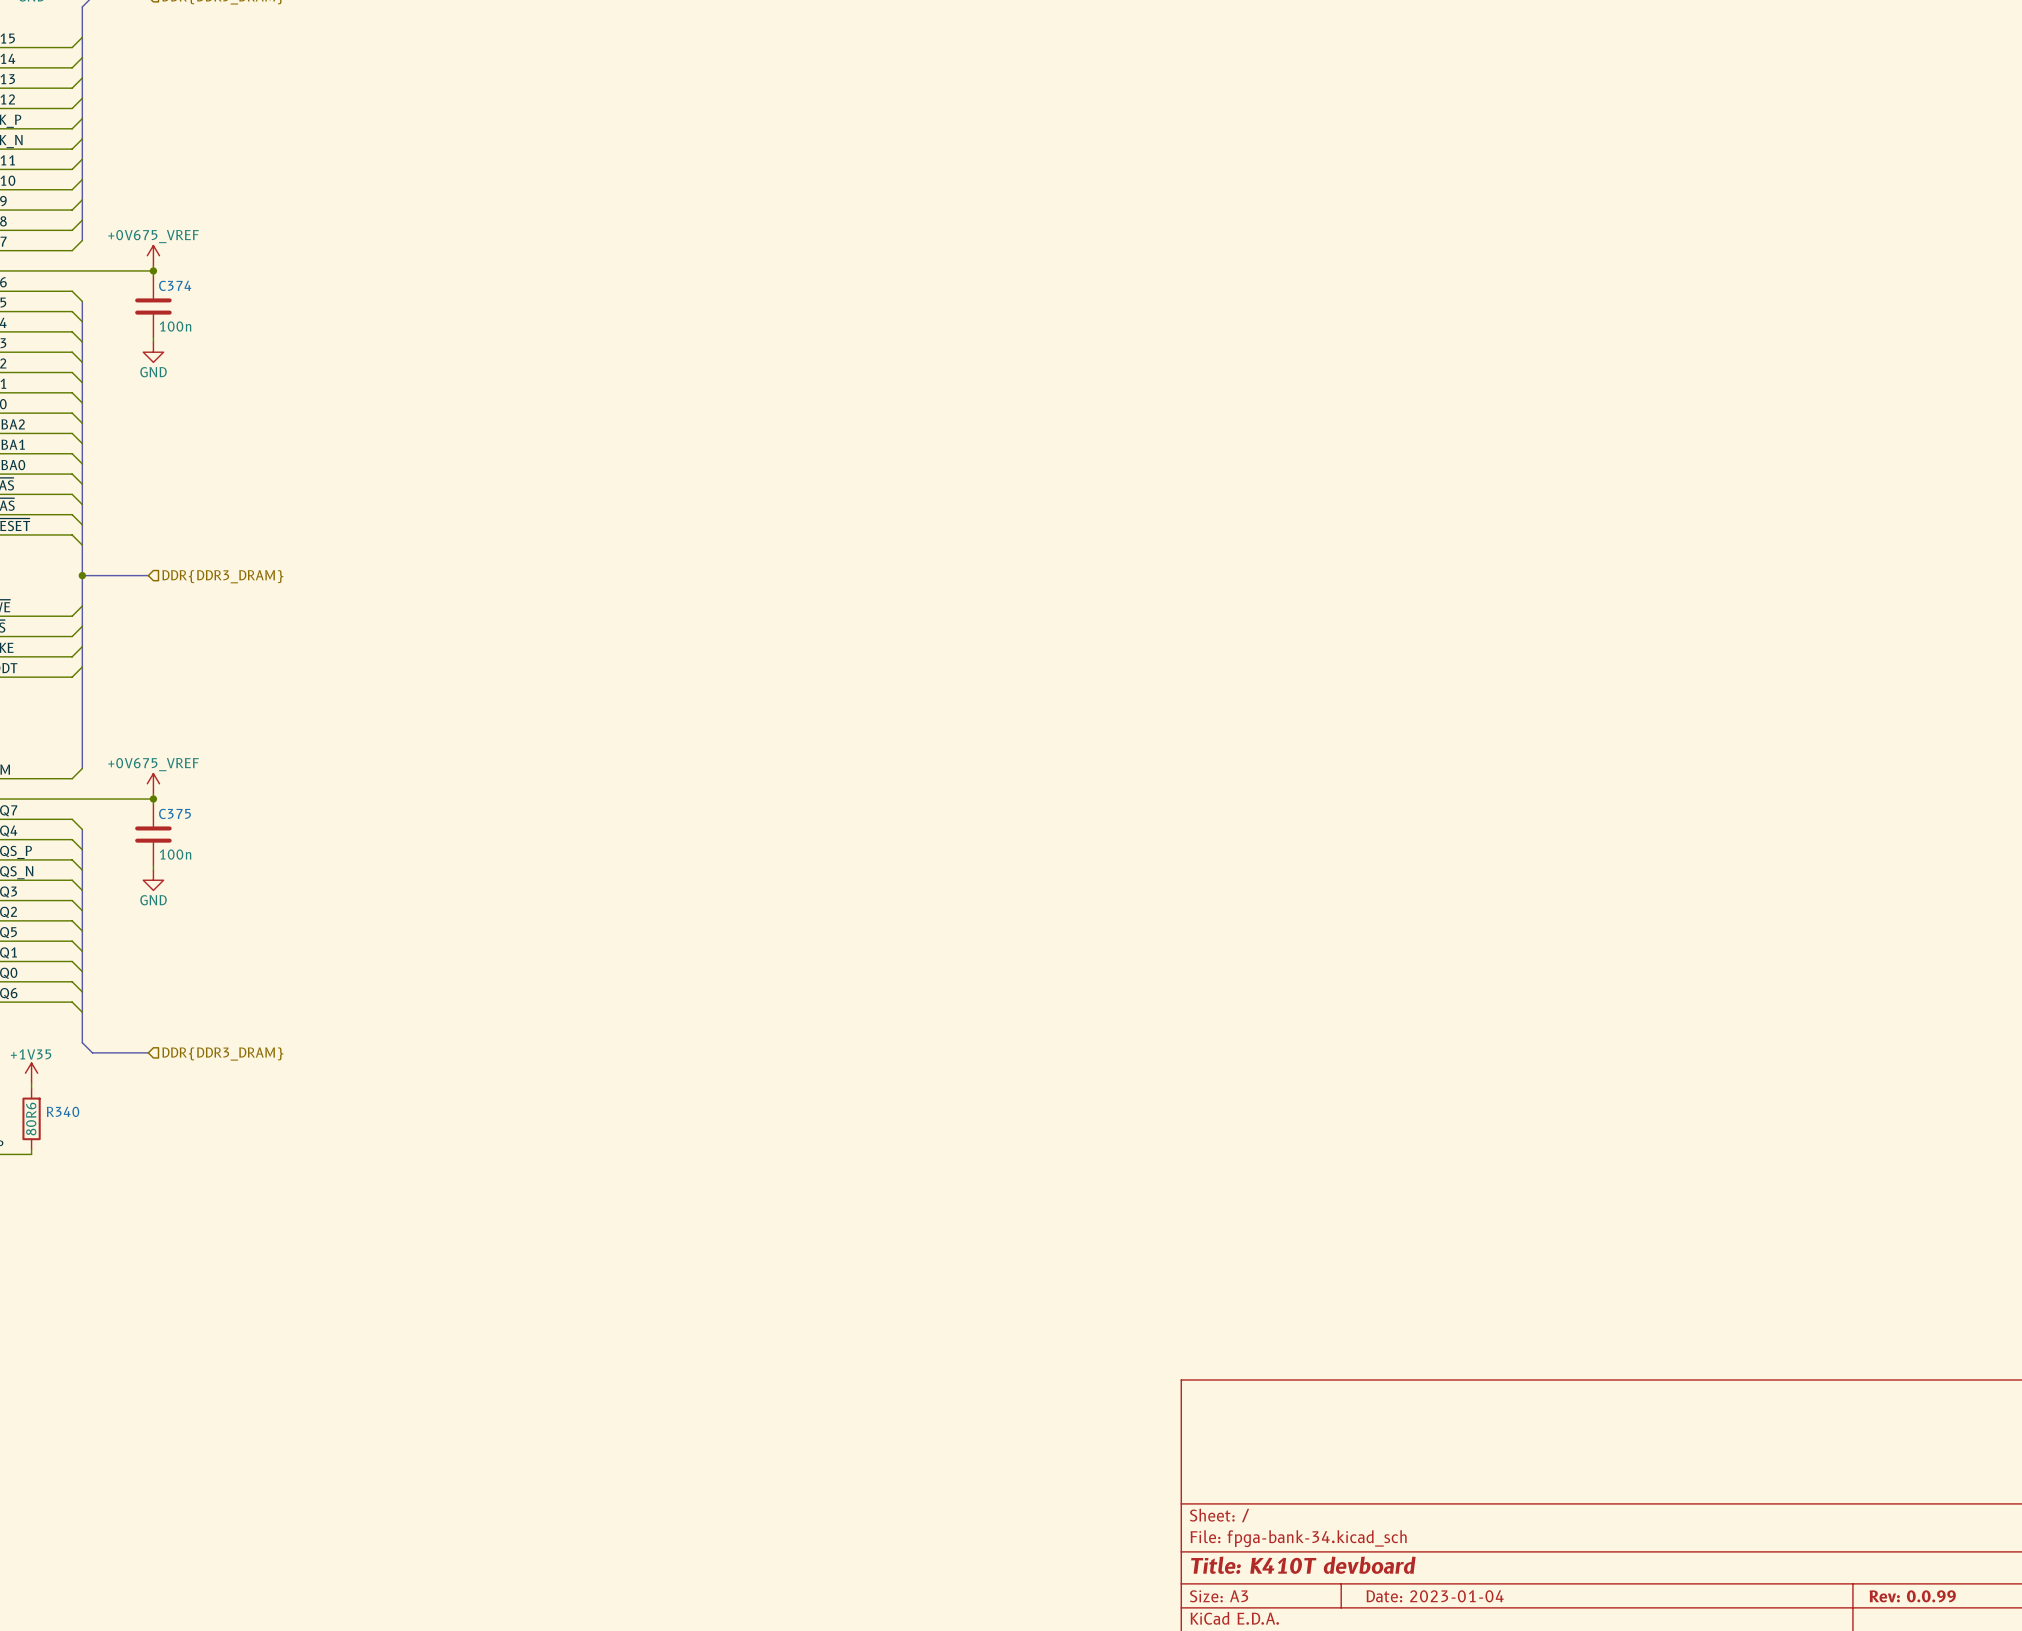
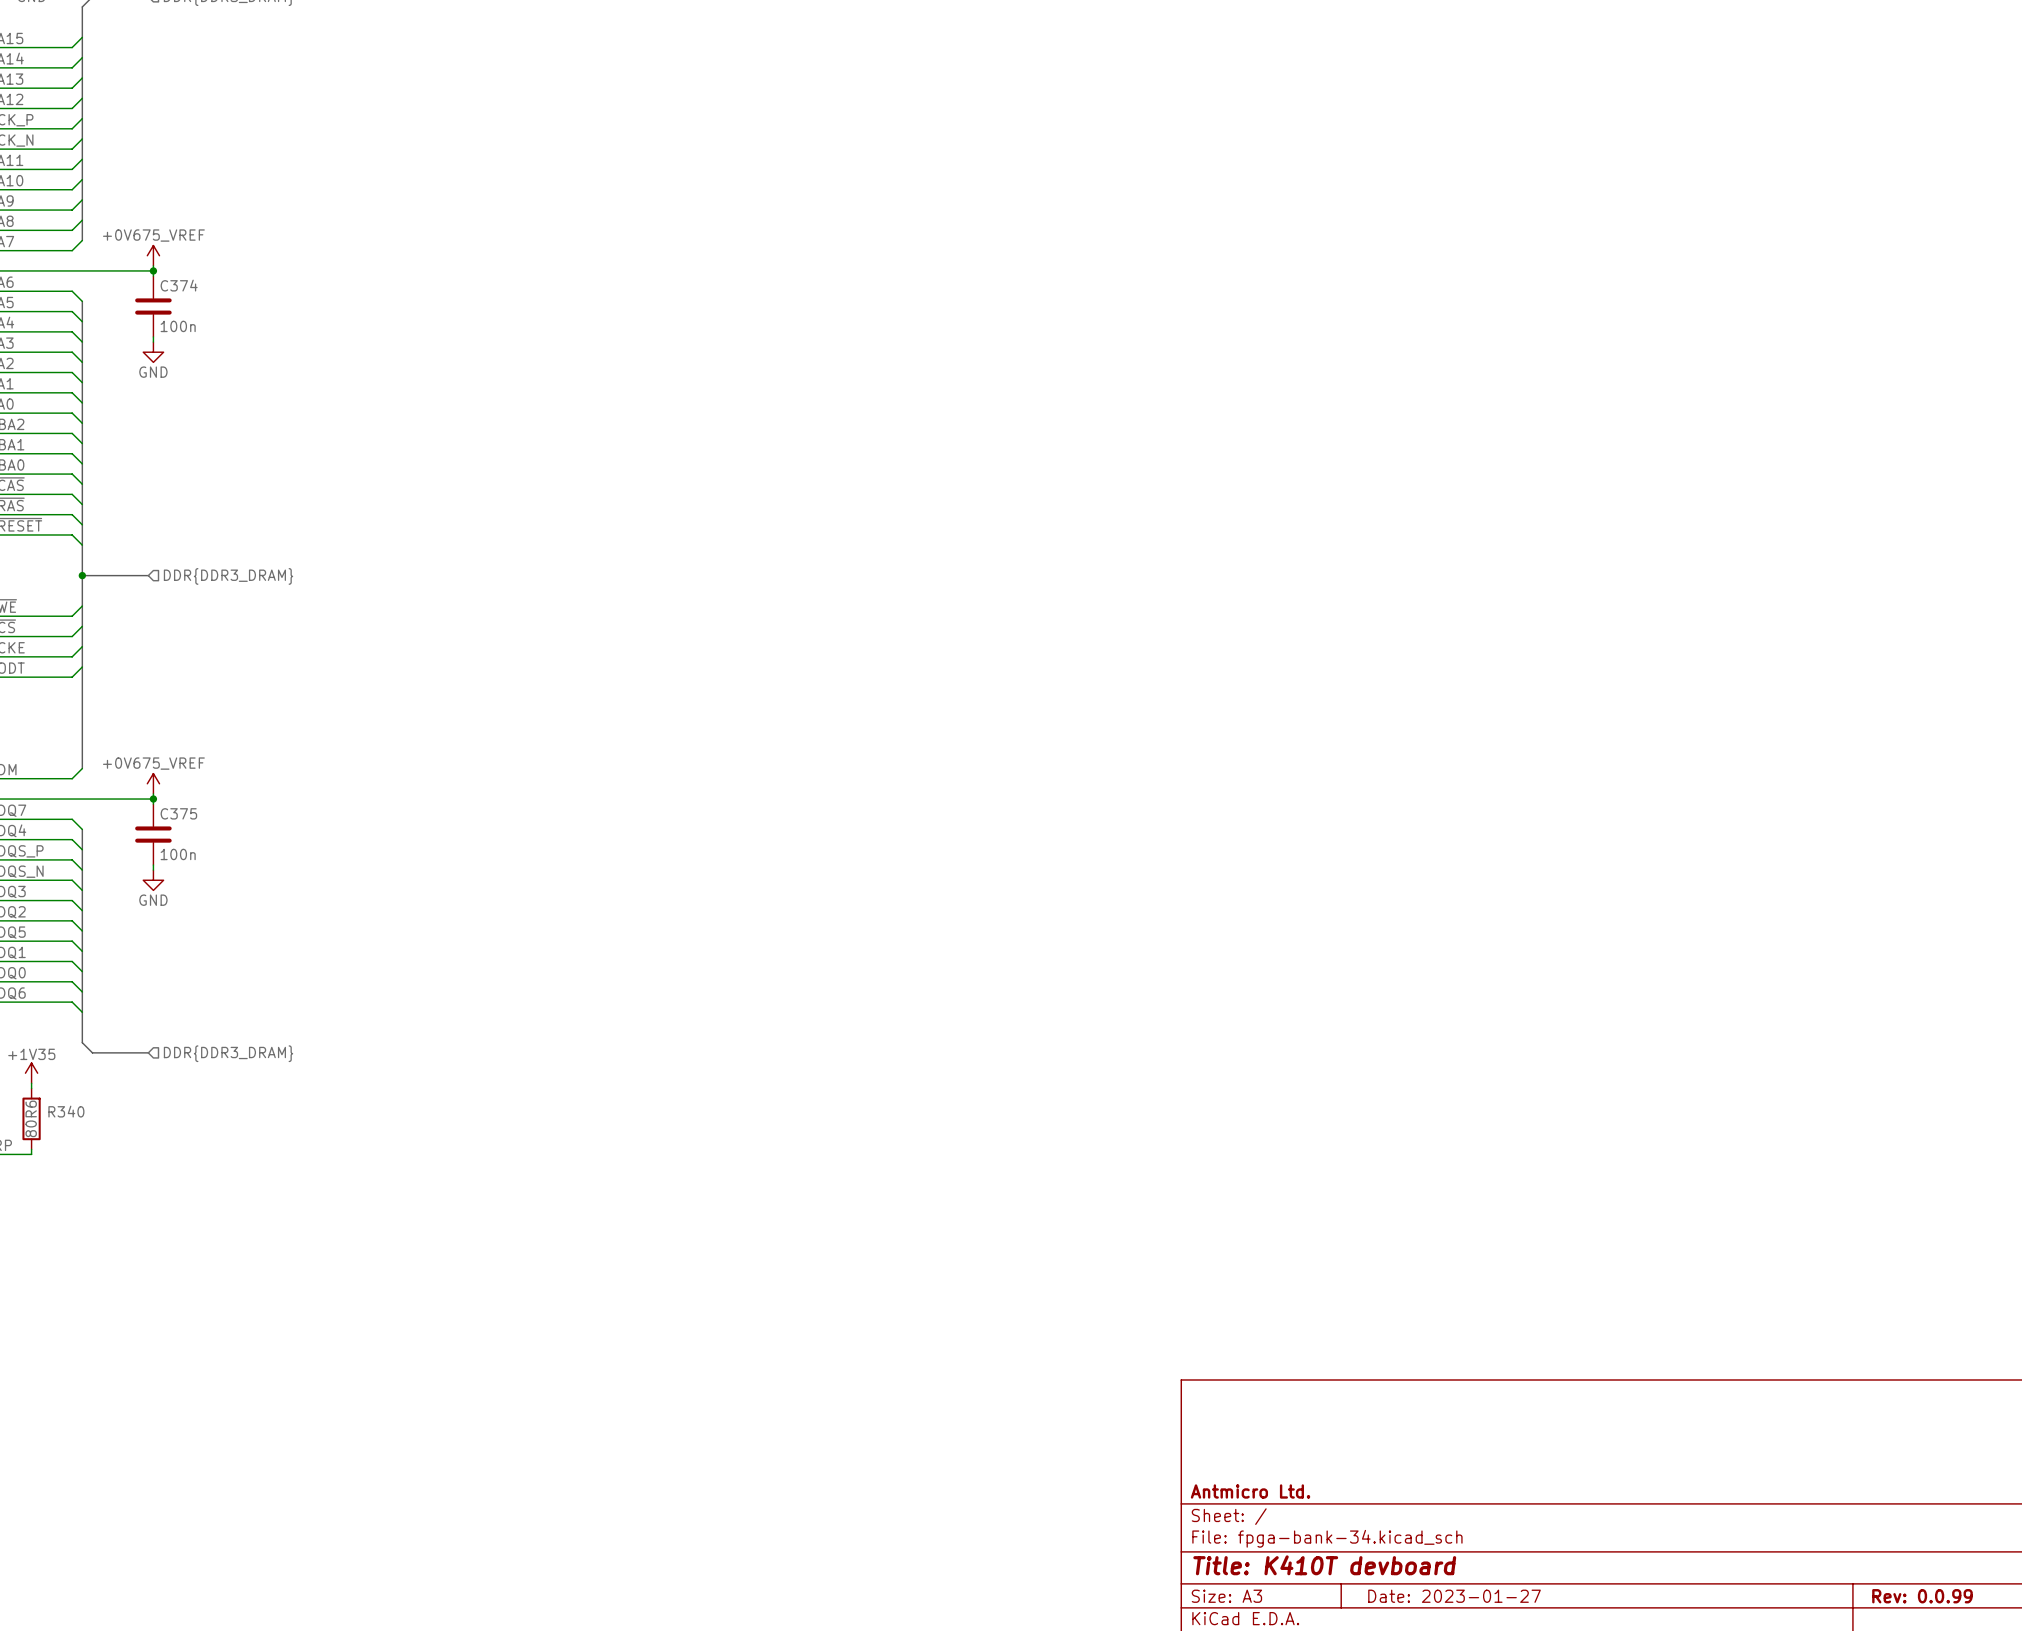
title block: none -> Antmicro Ltd. (1250, 1491)
title block: Date: 2023-01-04 (1435, 1596) -> Date: 2023-01-27 (1454, 1596)

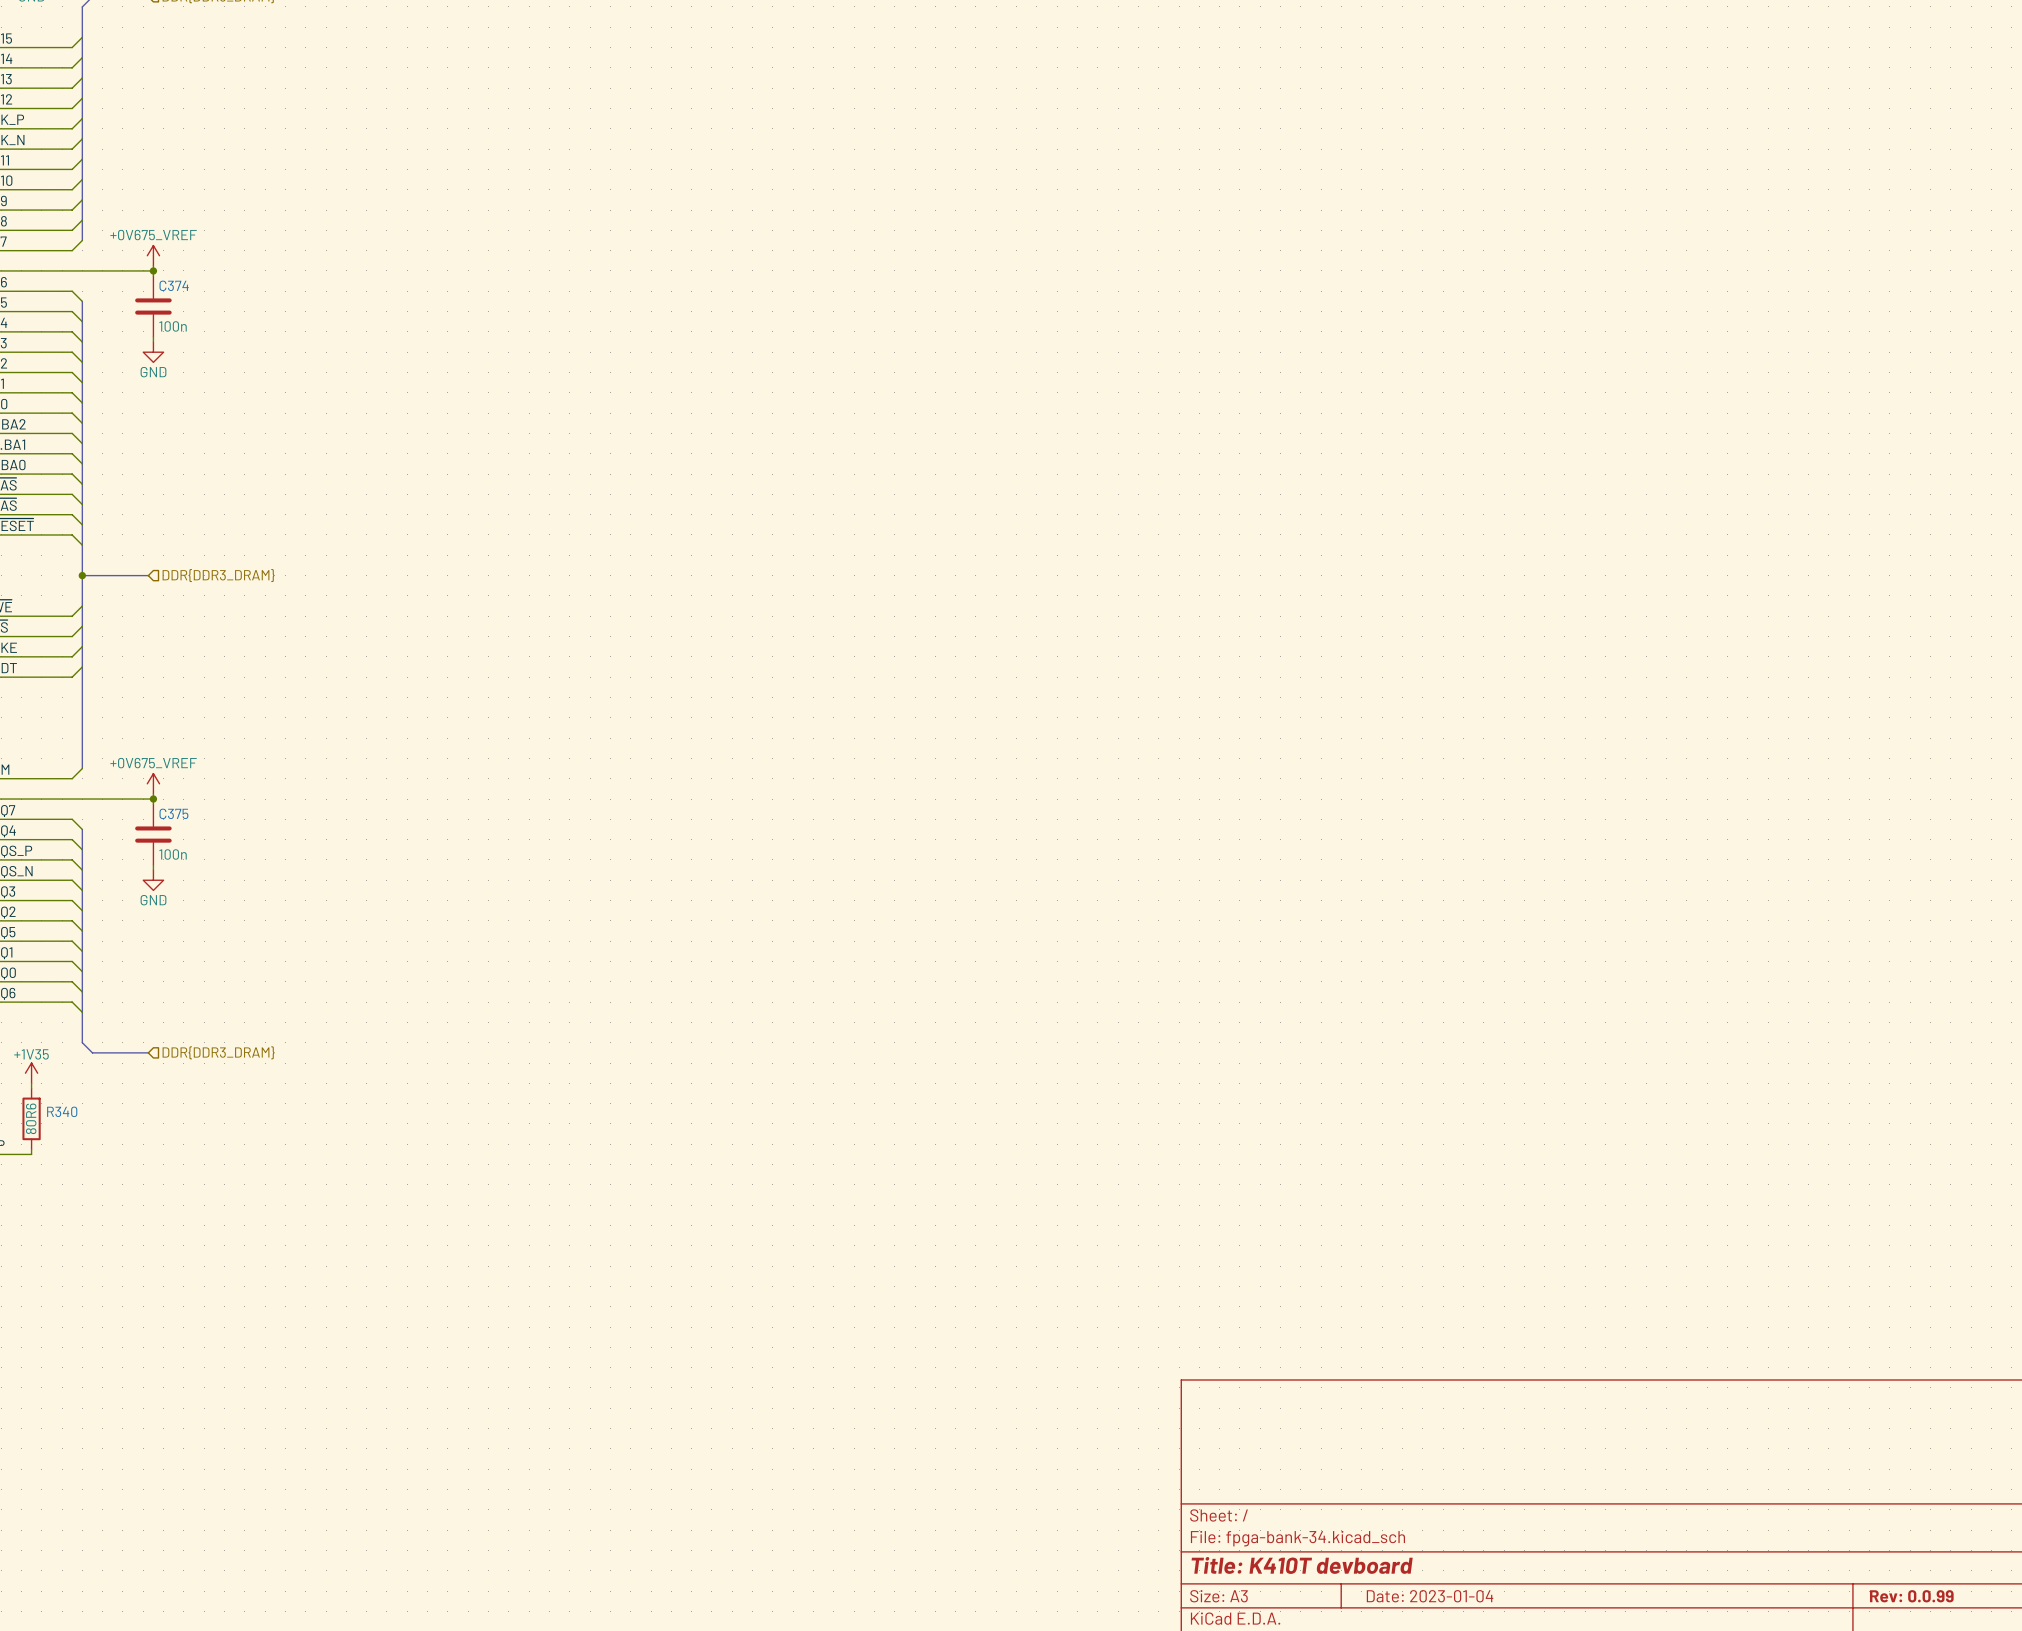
title block: Antmicro Ltd. (1250, 1491) -> none
title block: Date: 2023-01-27 (1454, 1596) -> Date: 2023-01-04 (1430, 1596)

